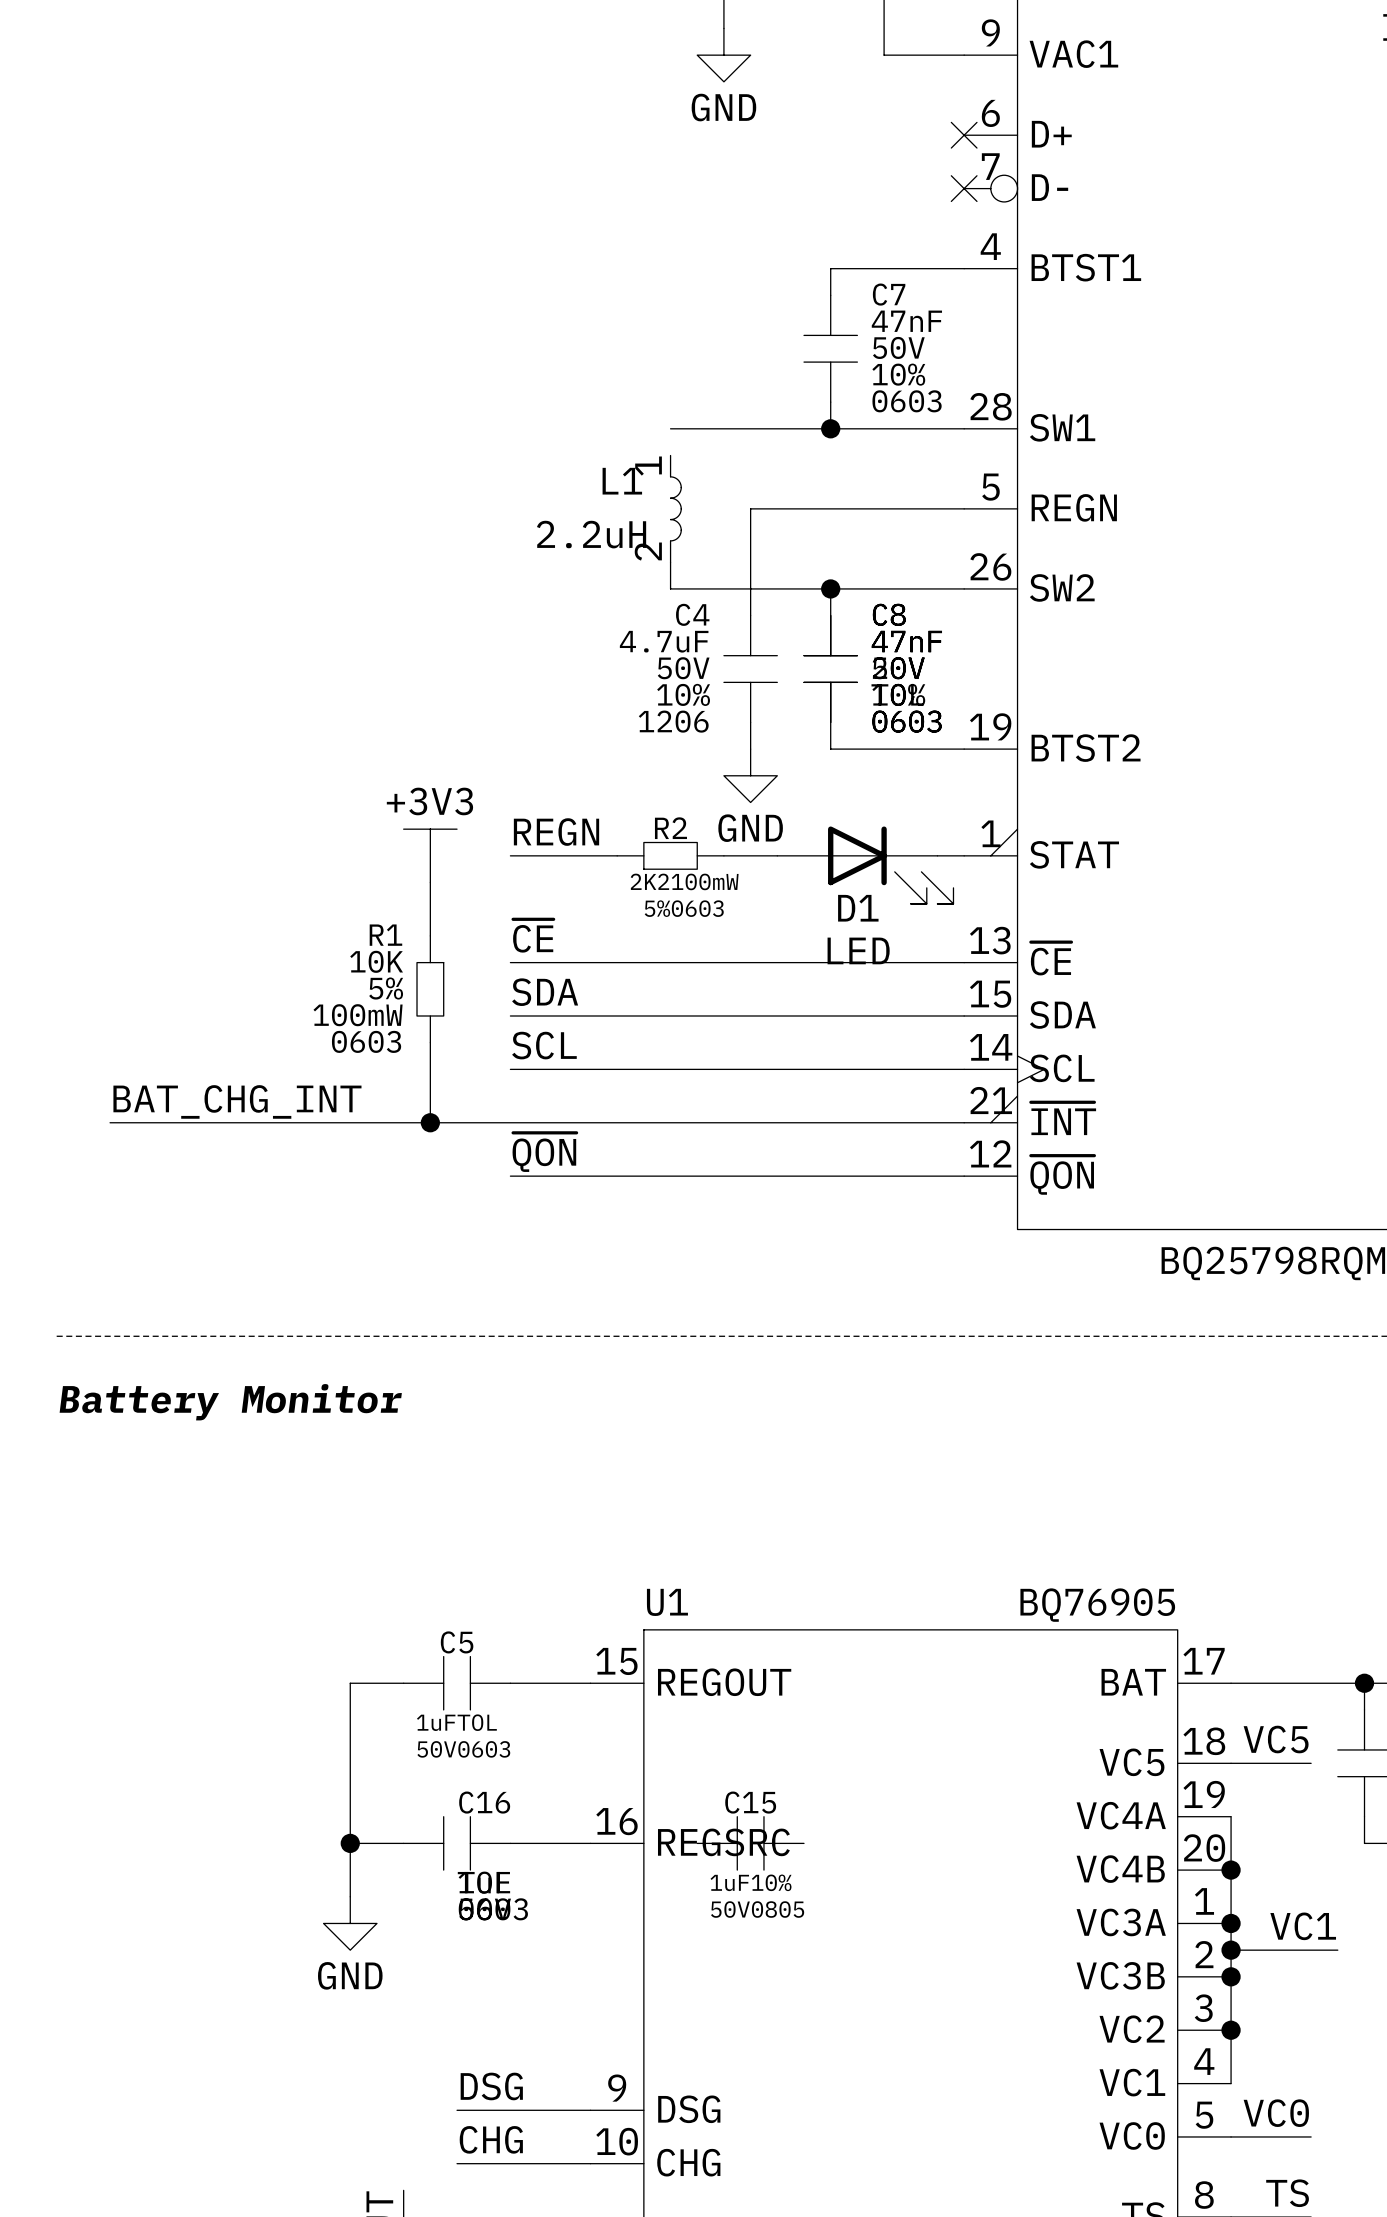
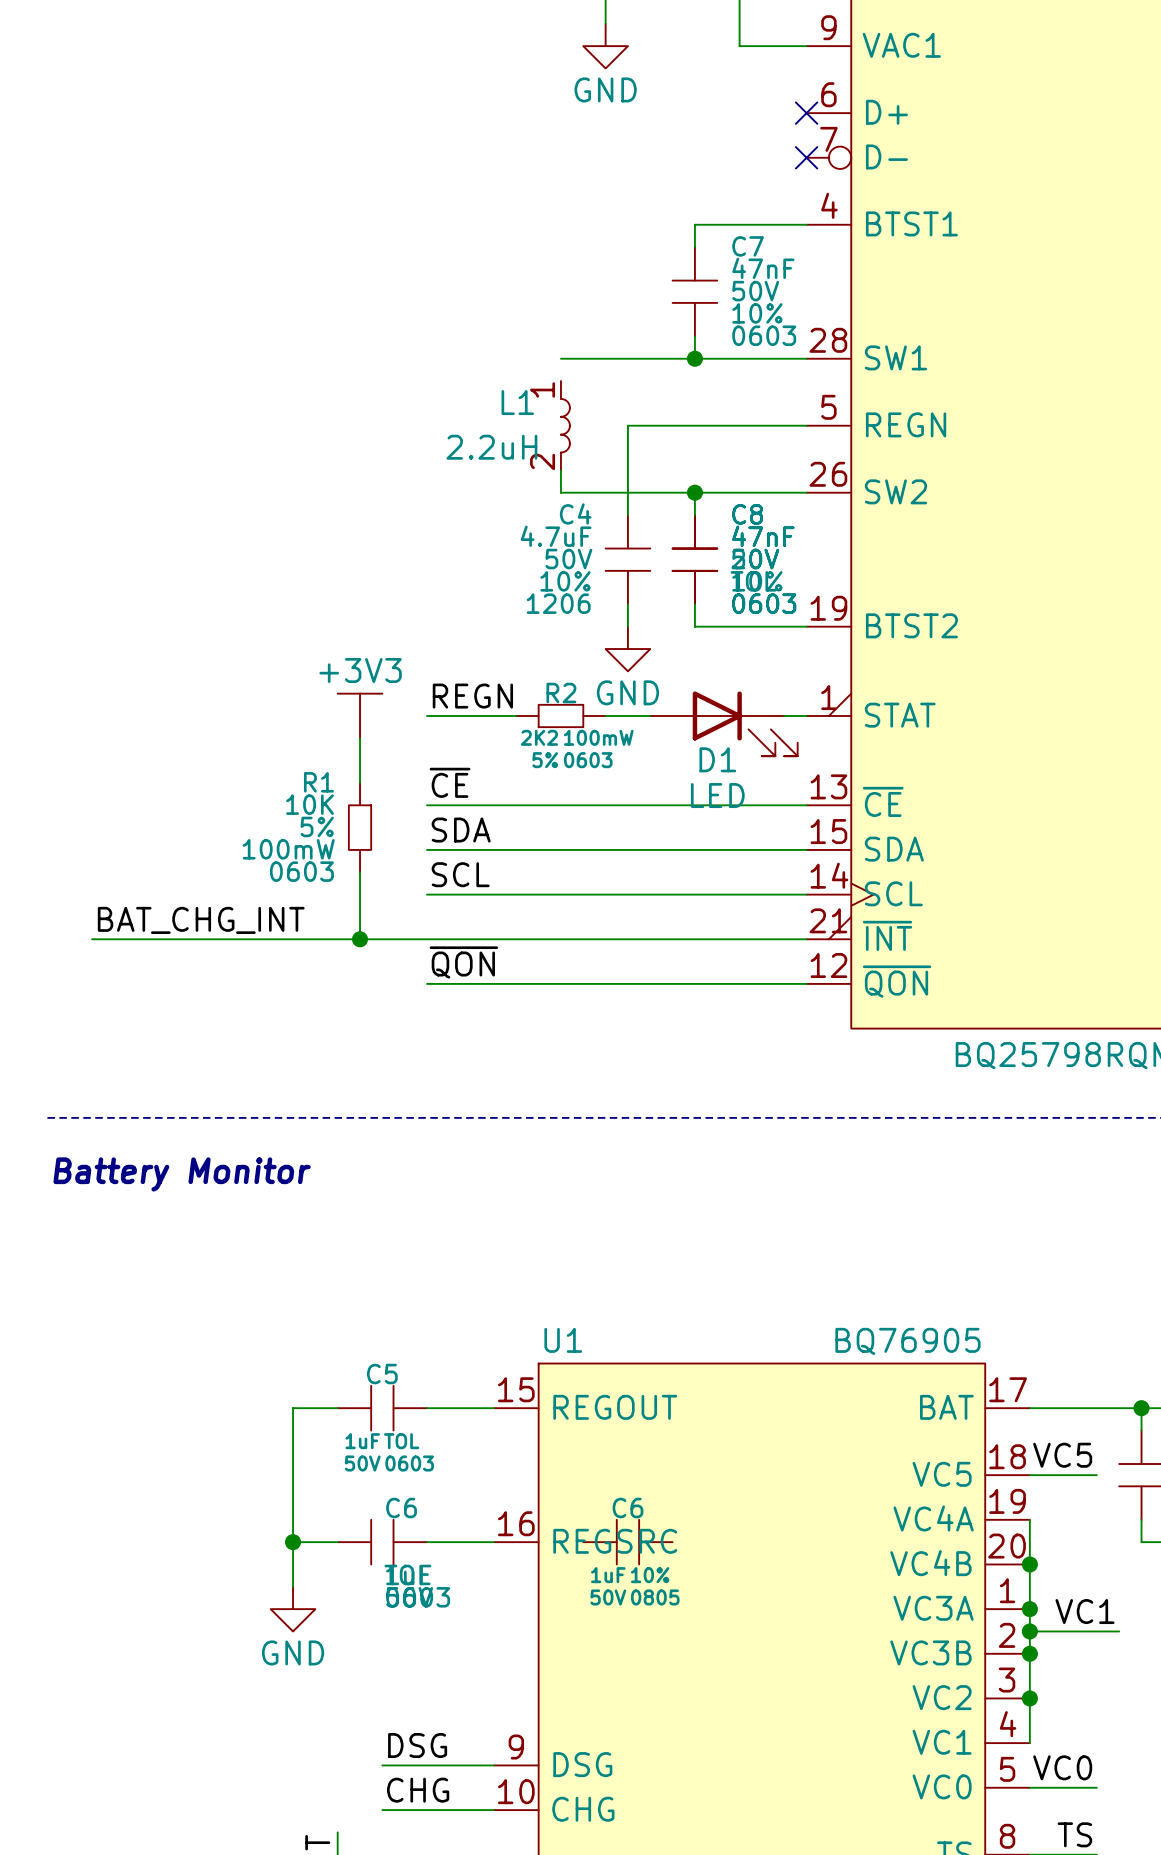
C16 name: C16 (484, 1802) -> C6 (401, 1507)
C15 name: C15 (750, 1802) -> C6 (627, 1507)

